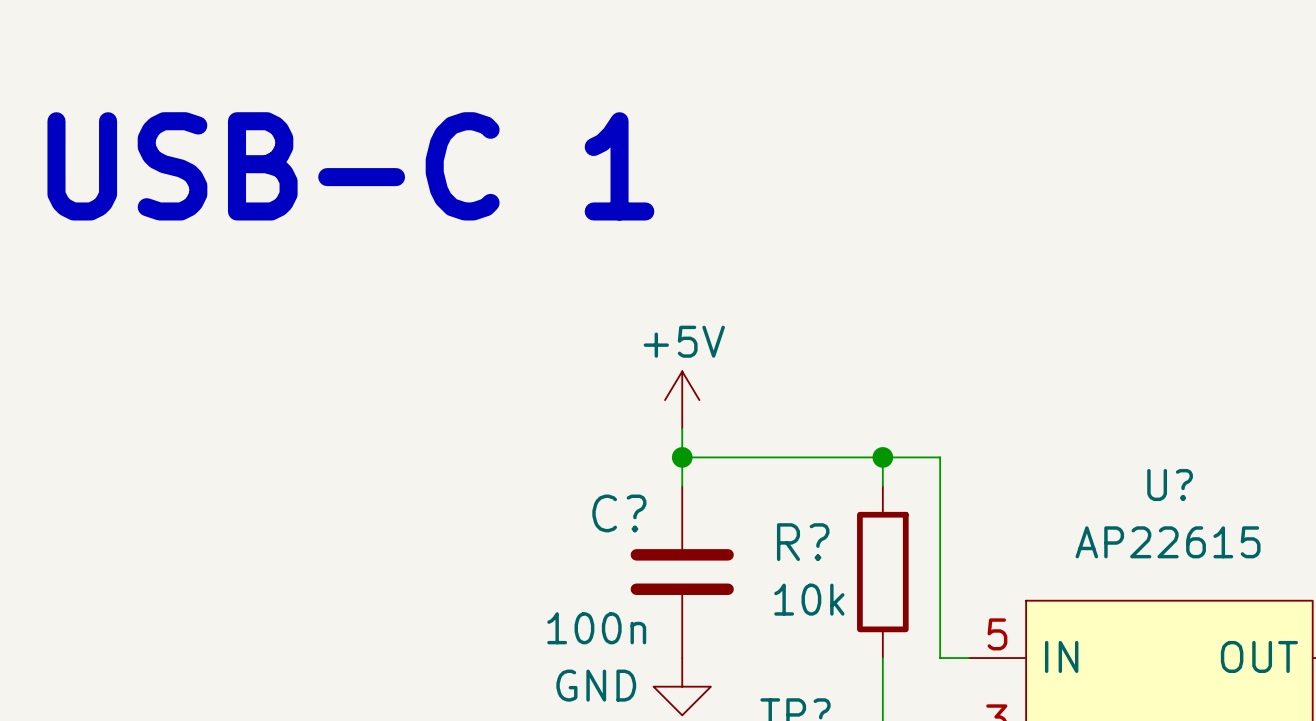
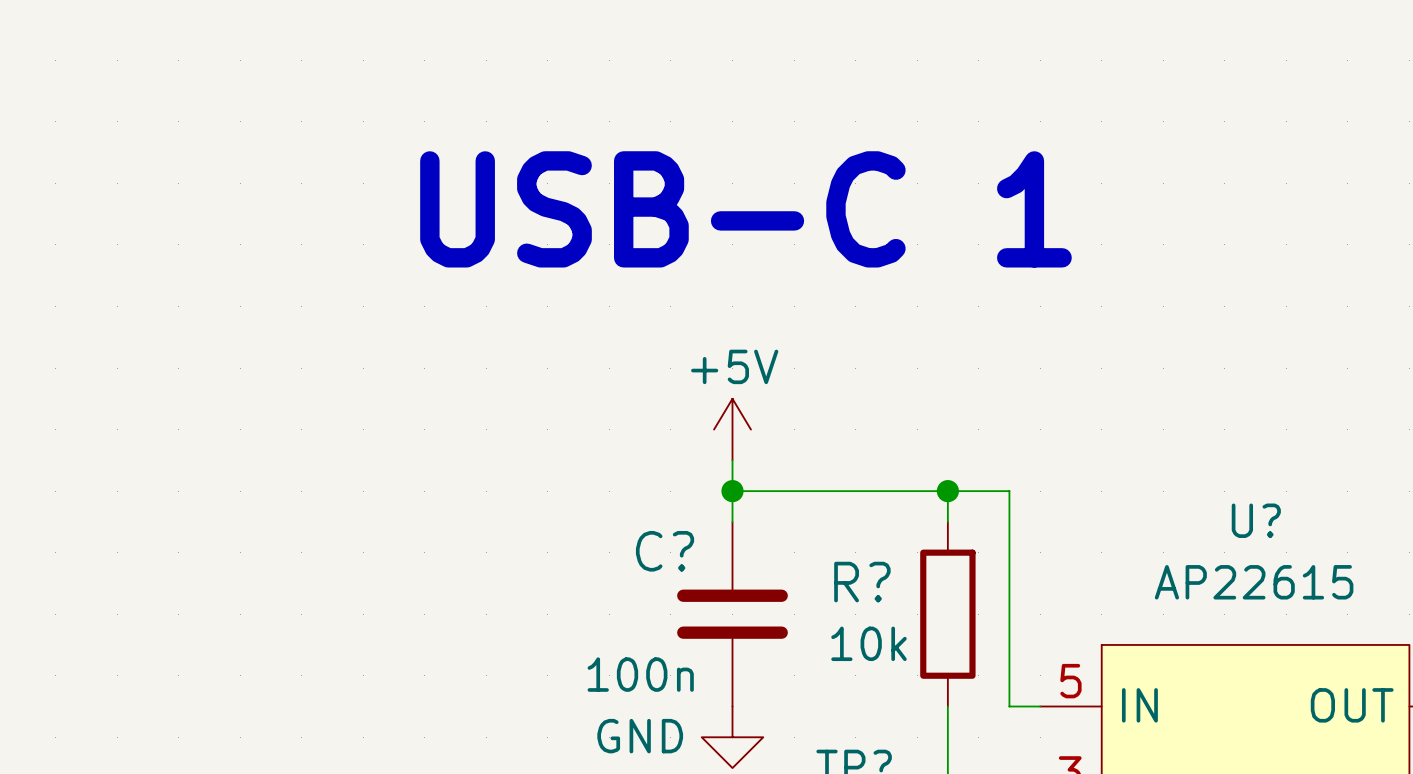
text position: USB-C 1 (350, 166) -> USB-C 1 (745, 209)

